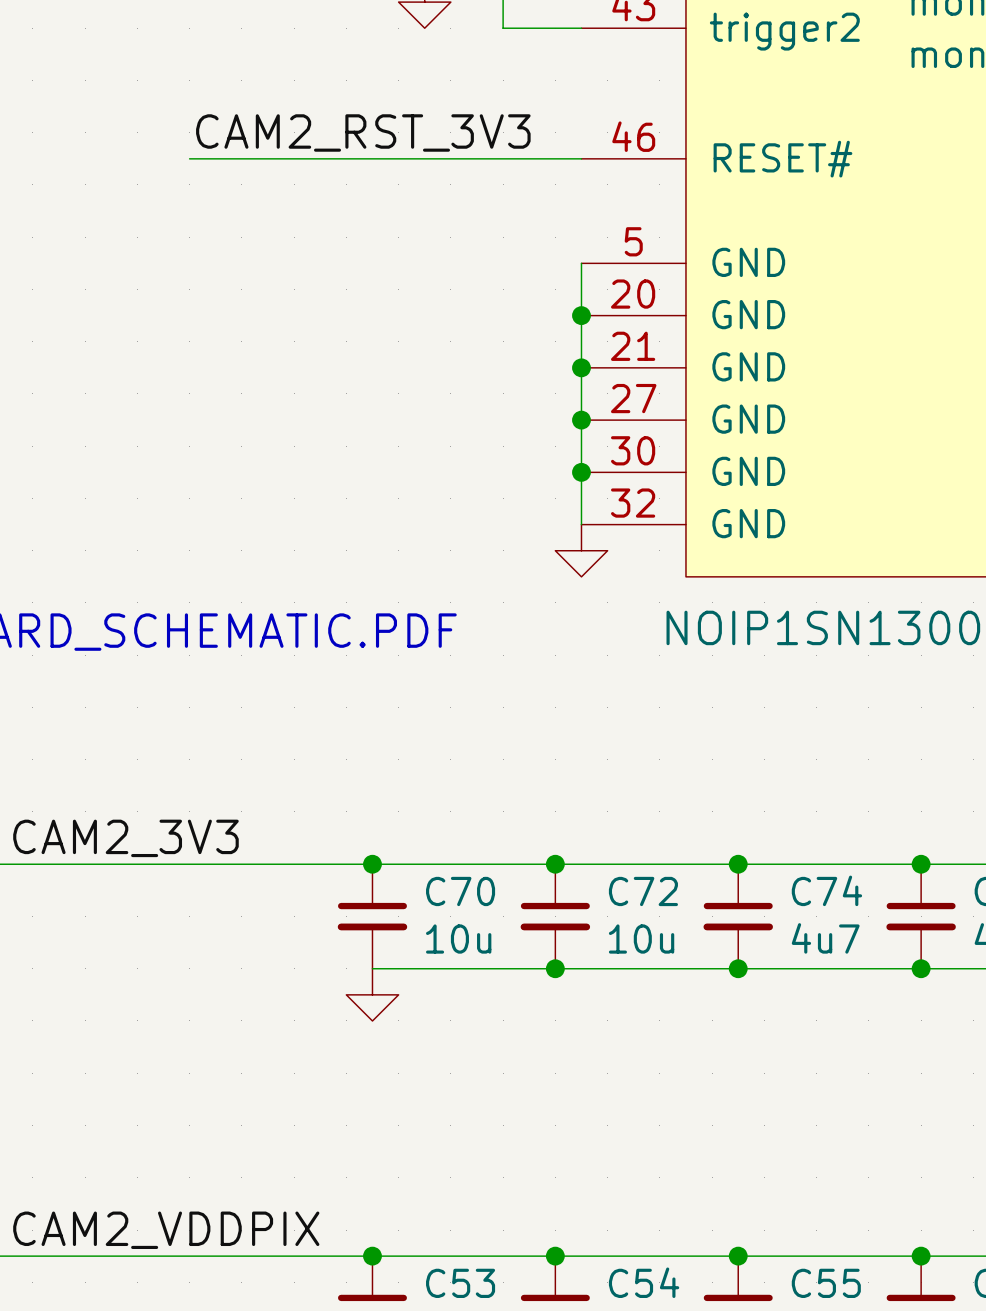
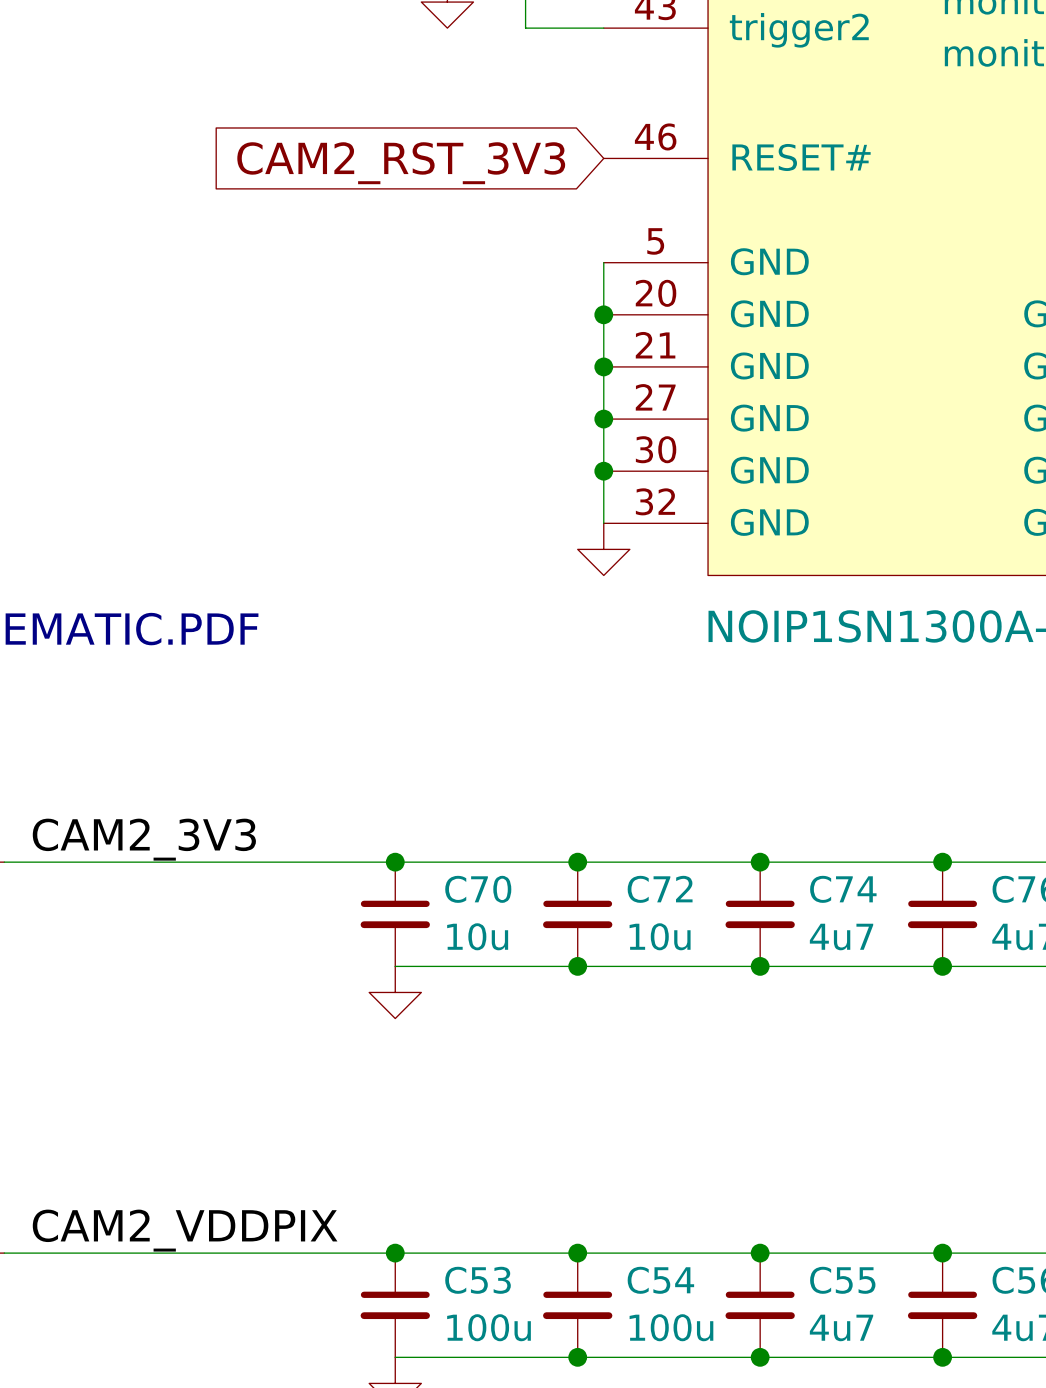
label: CAM2_RST_3V3 (363, 132) -> none
wire: (189, 158) (581, 158) -> none
global label: none -> CAM2_RST_3V3 (401, 163)

